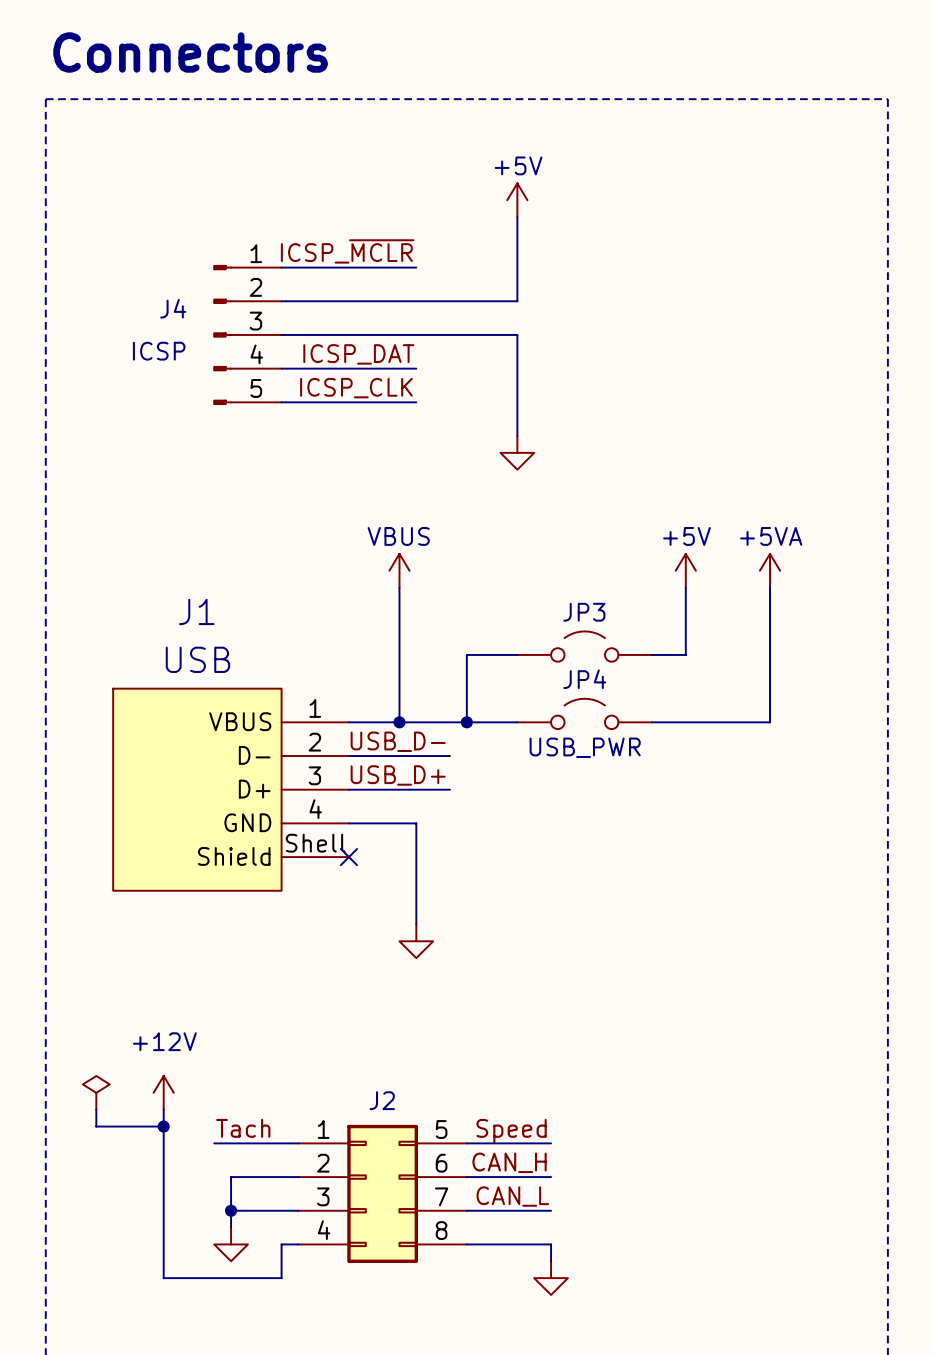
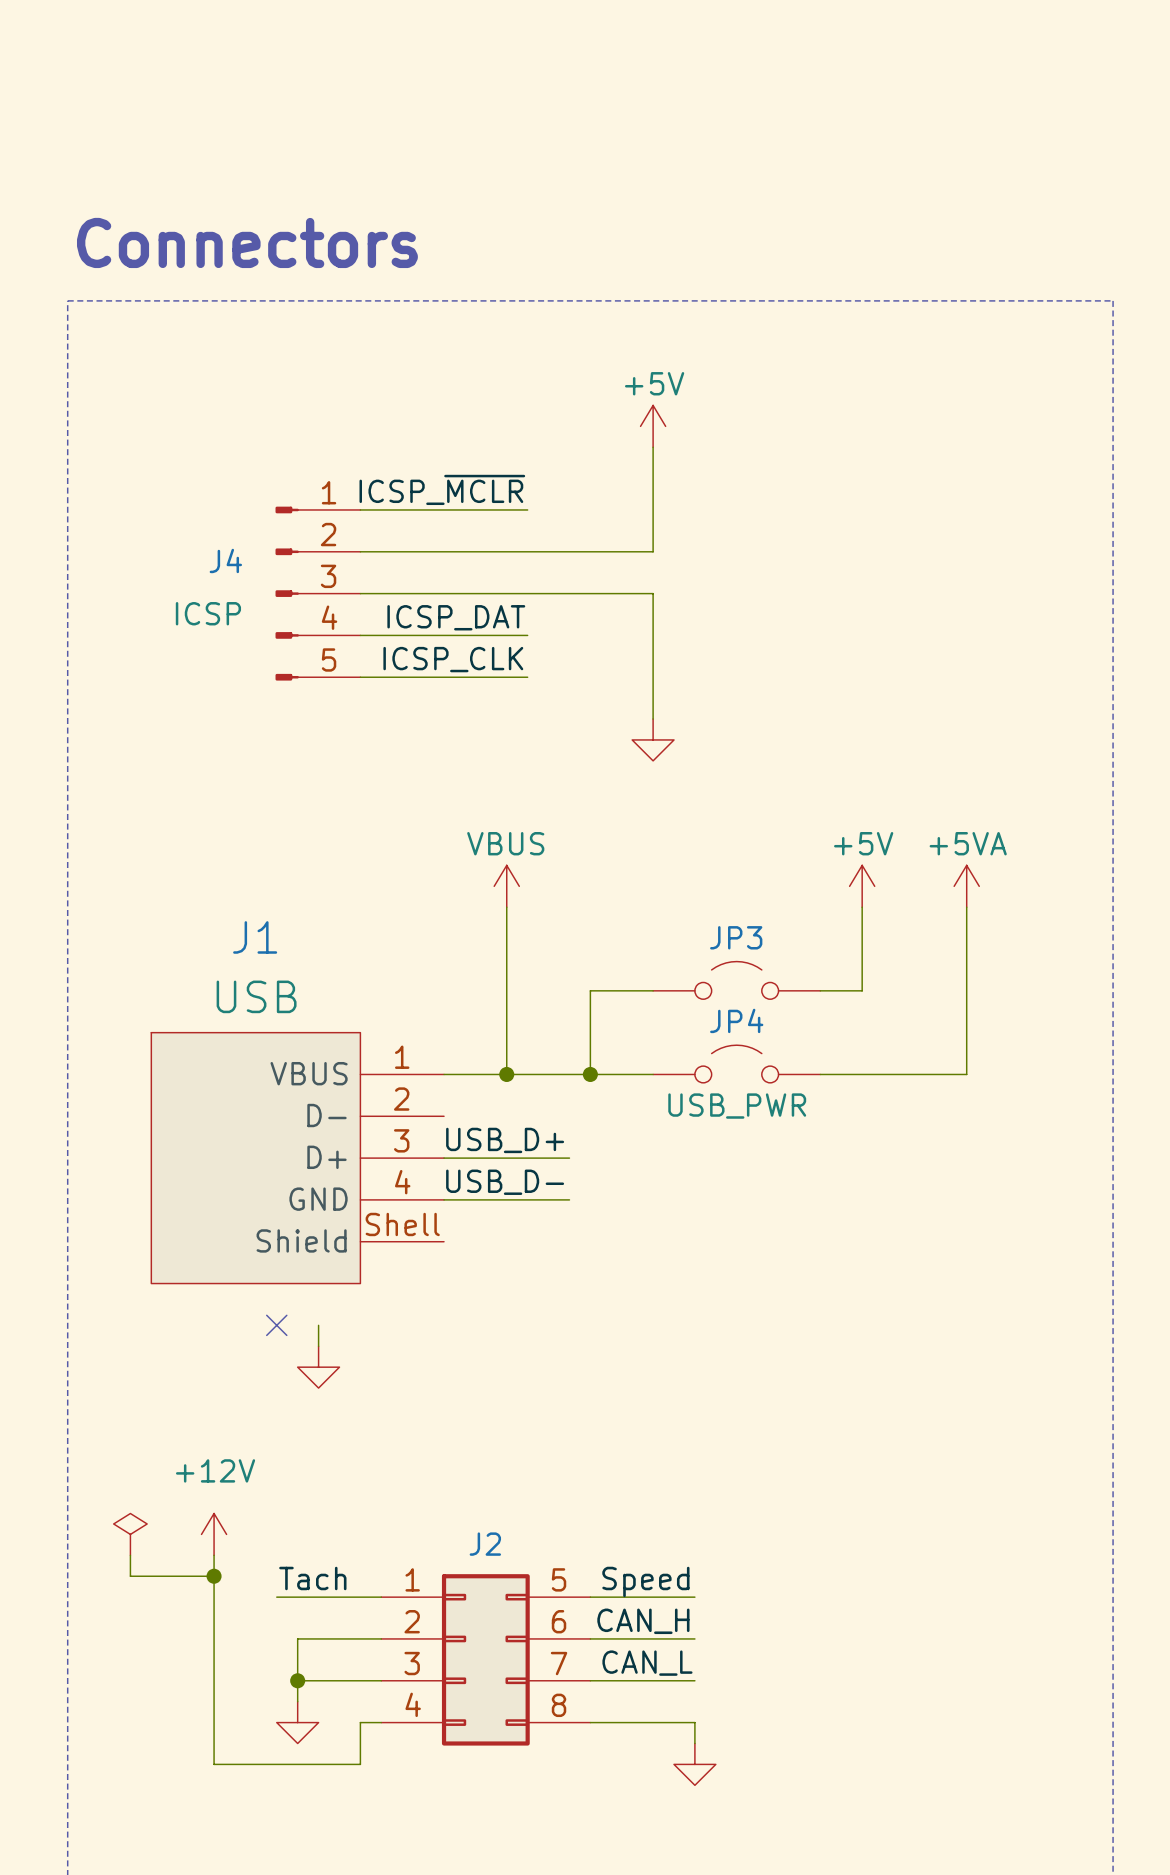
label position: USB_D- (398, 741) -> USB_D- (505, 1182)
wire: (348, 756) (450, 756) -> none
wire: (416, 823) (416, 924) -> (527, 1199) (569, 1199)
no-connect mark: (348, 857) -> none
no-connect mark: none -> (276, 1325)
wire: none -> (318, 1325) (318, 1346)
power symbol position: (416, 941) -> (318, 1367)

